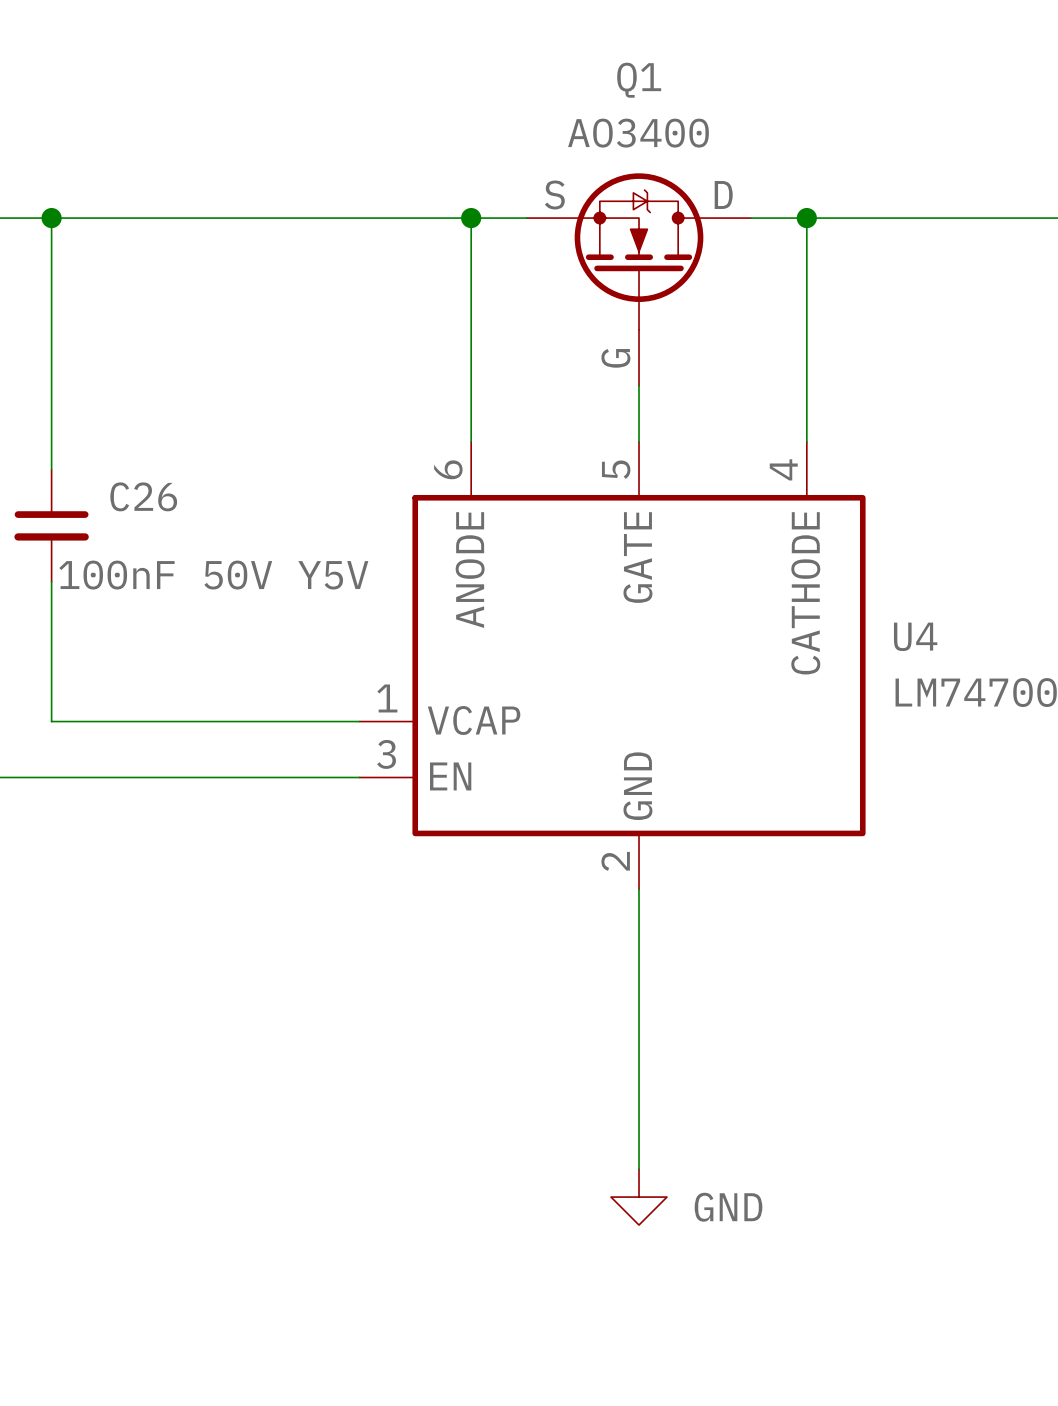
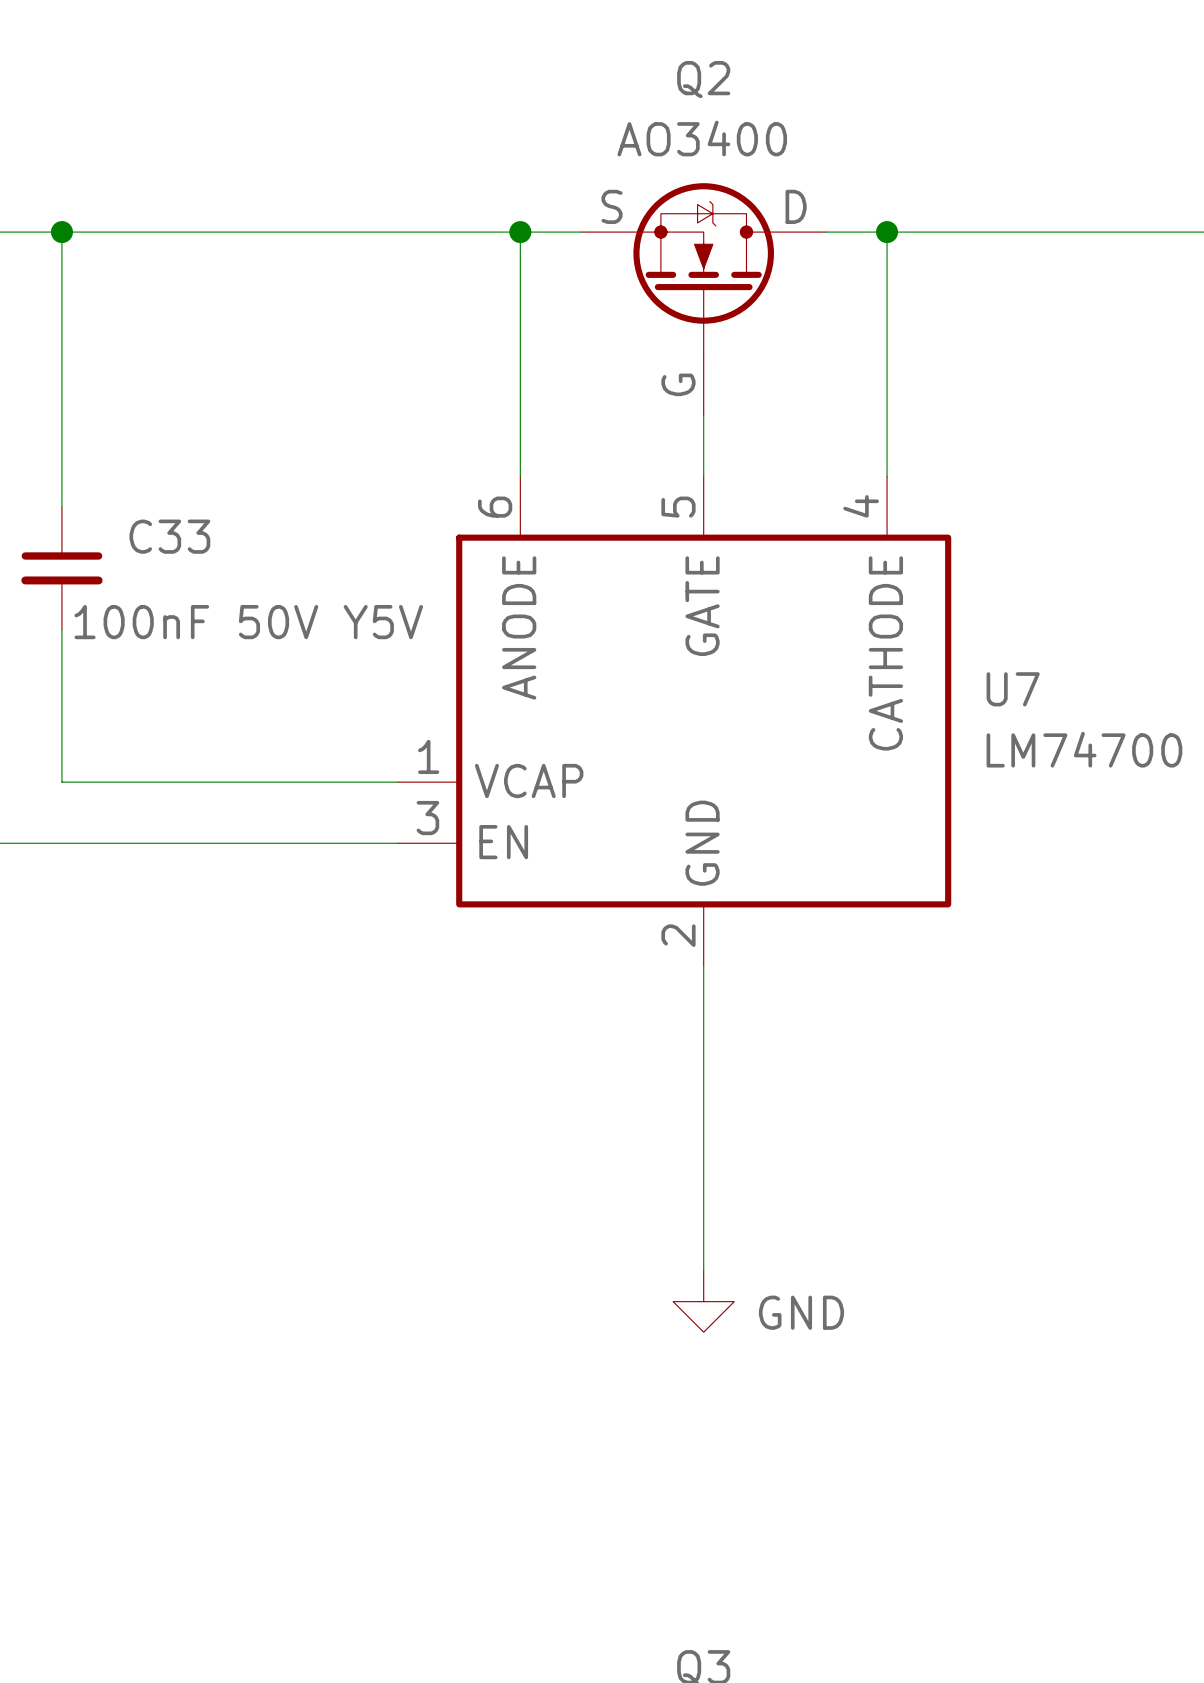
Q1 name: Q1 (639, 80) -> Q2 (703, 79)
C26 name: C26 (143, 496) -> C33 (169, 536)
U4 name: U4 (915, 636) -> U7 (1013, 689)

